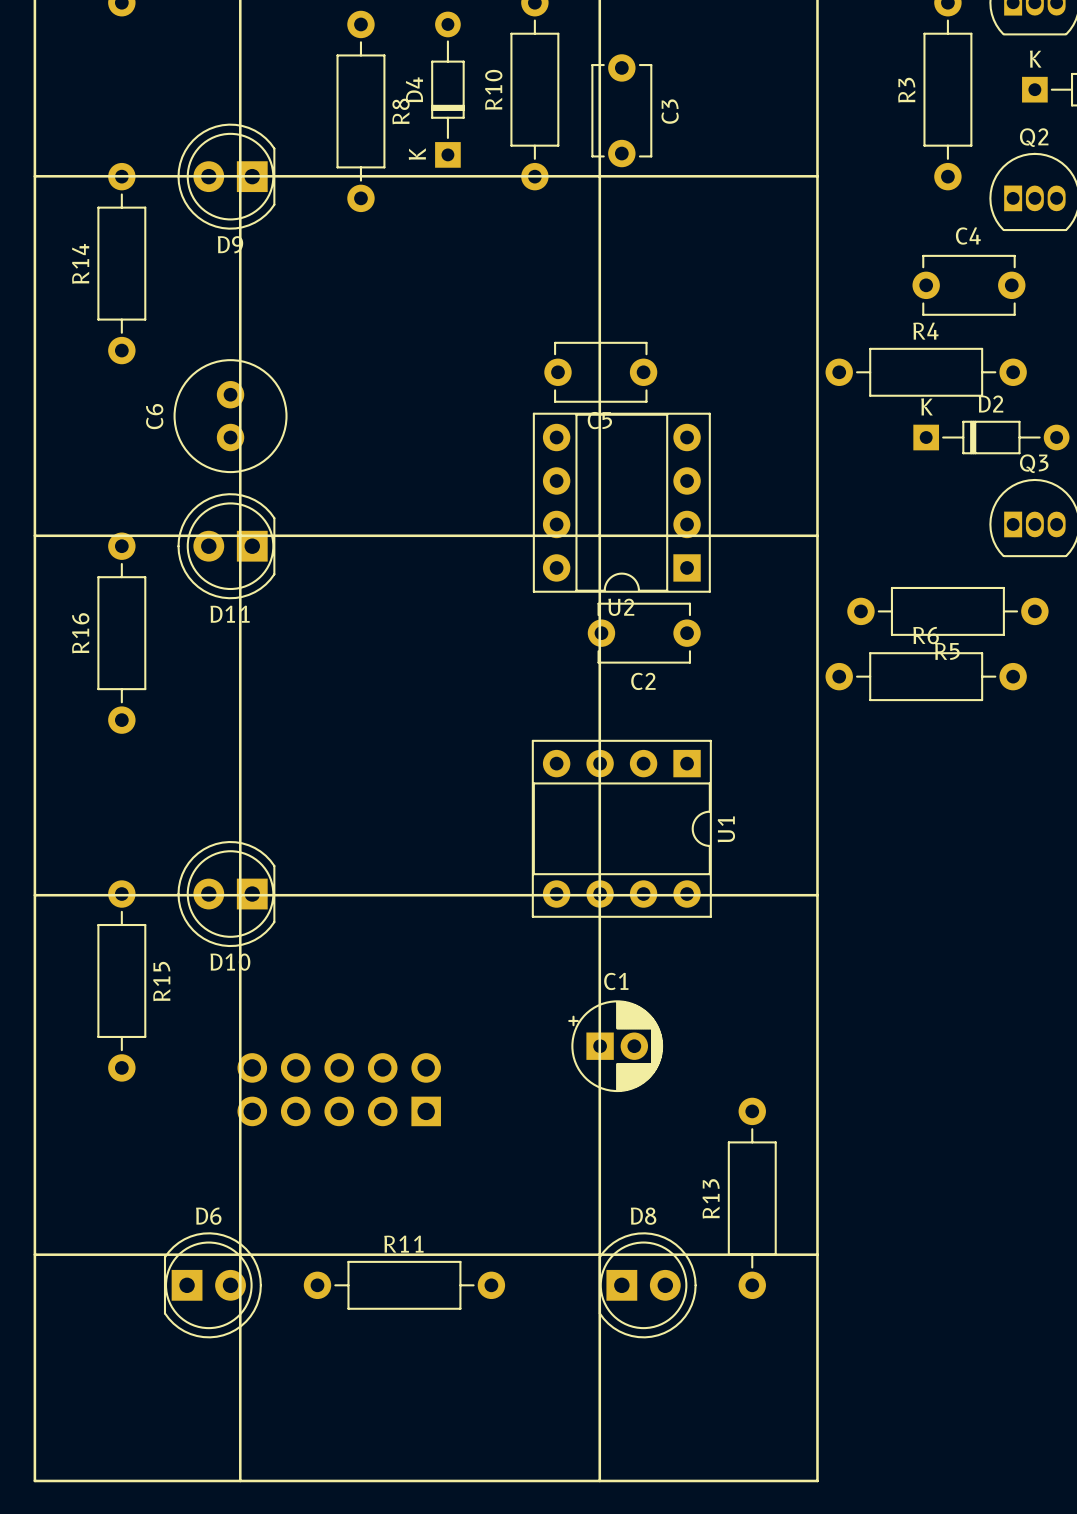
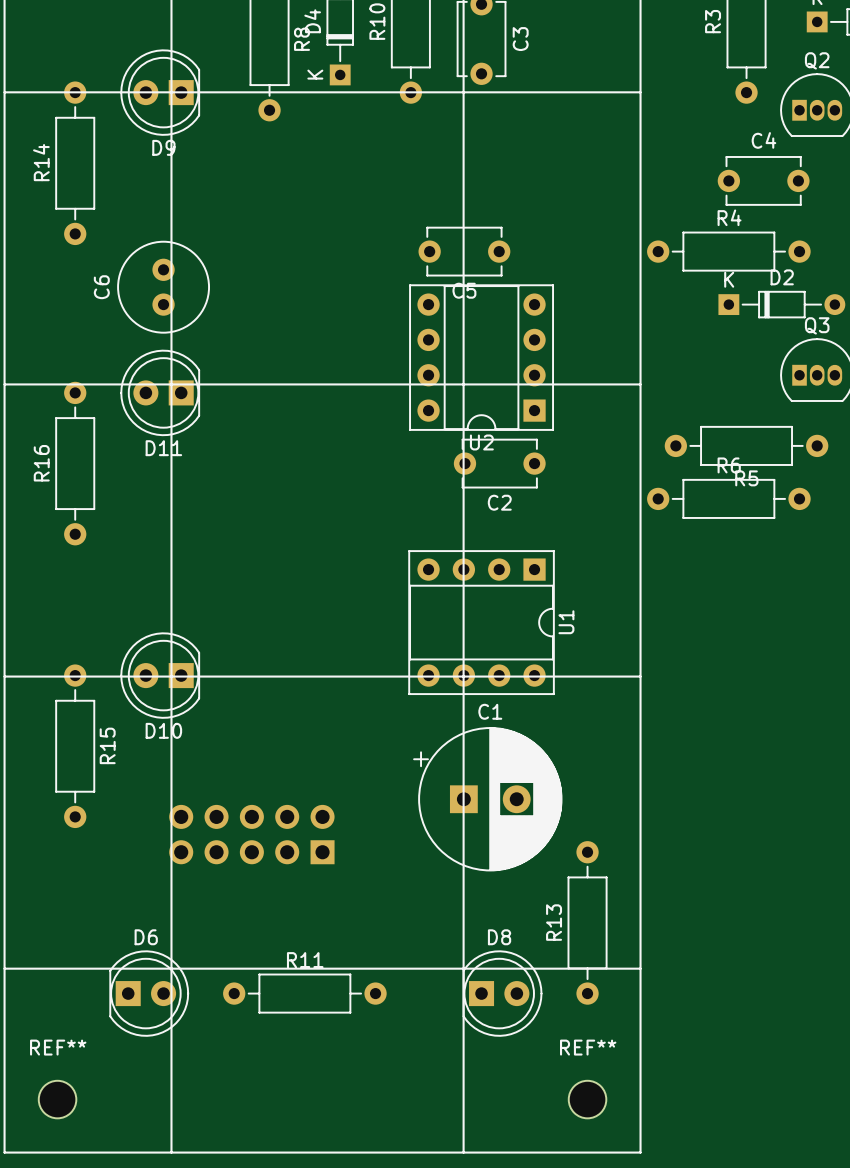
C1 name position: C1 (616, 981) -> C1 (490, 711)
C1 footprint: [568, 1000, 664, 1093] -> [413, 727, 563, 872]
REF**: none -> (57, 1099)
REF**: none -> (587, 1099)

